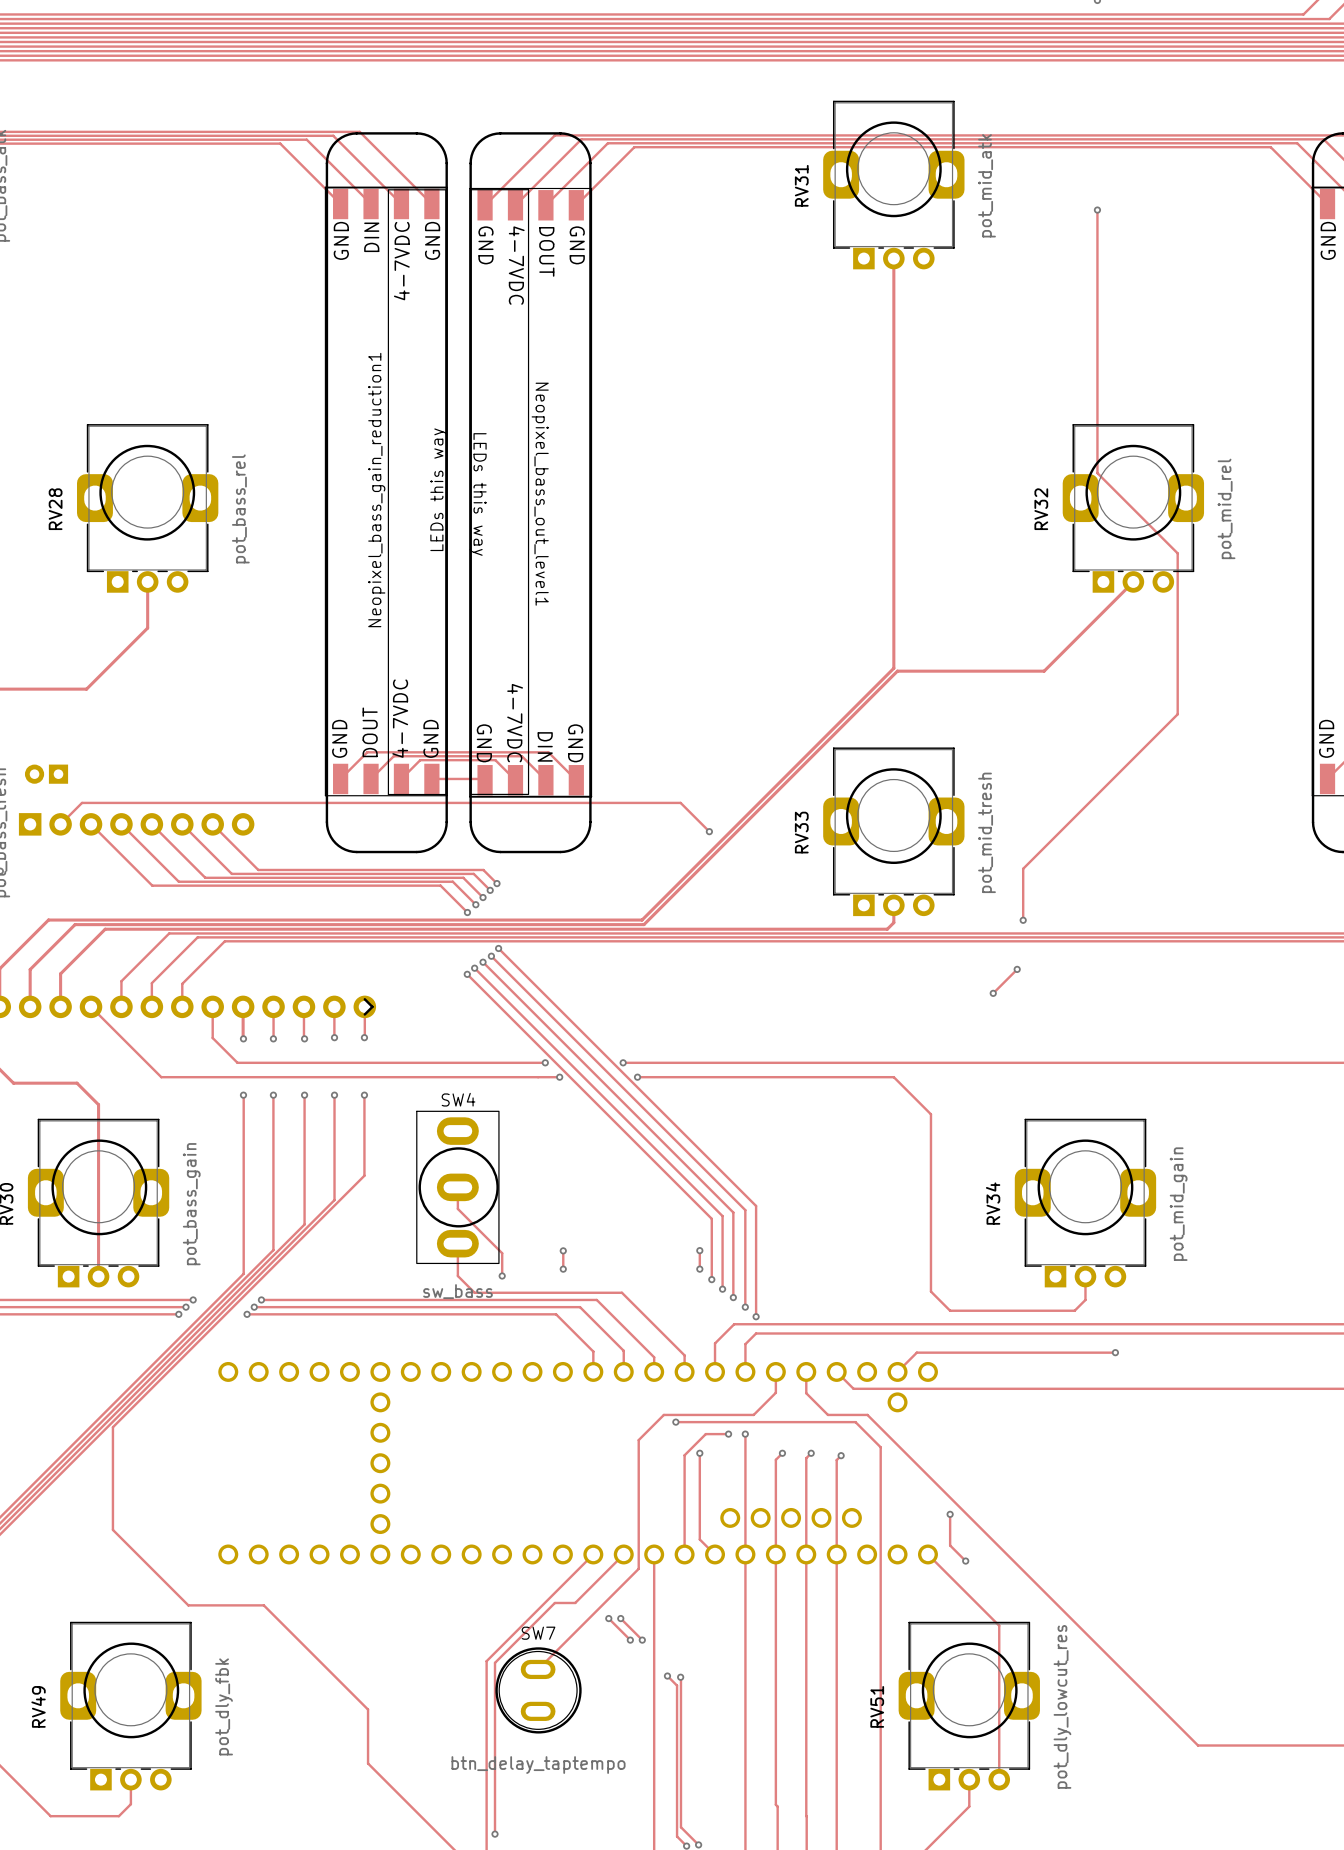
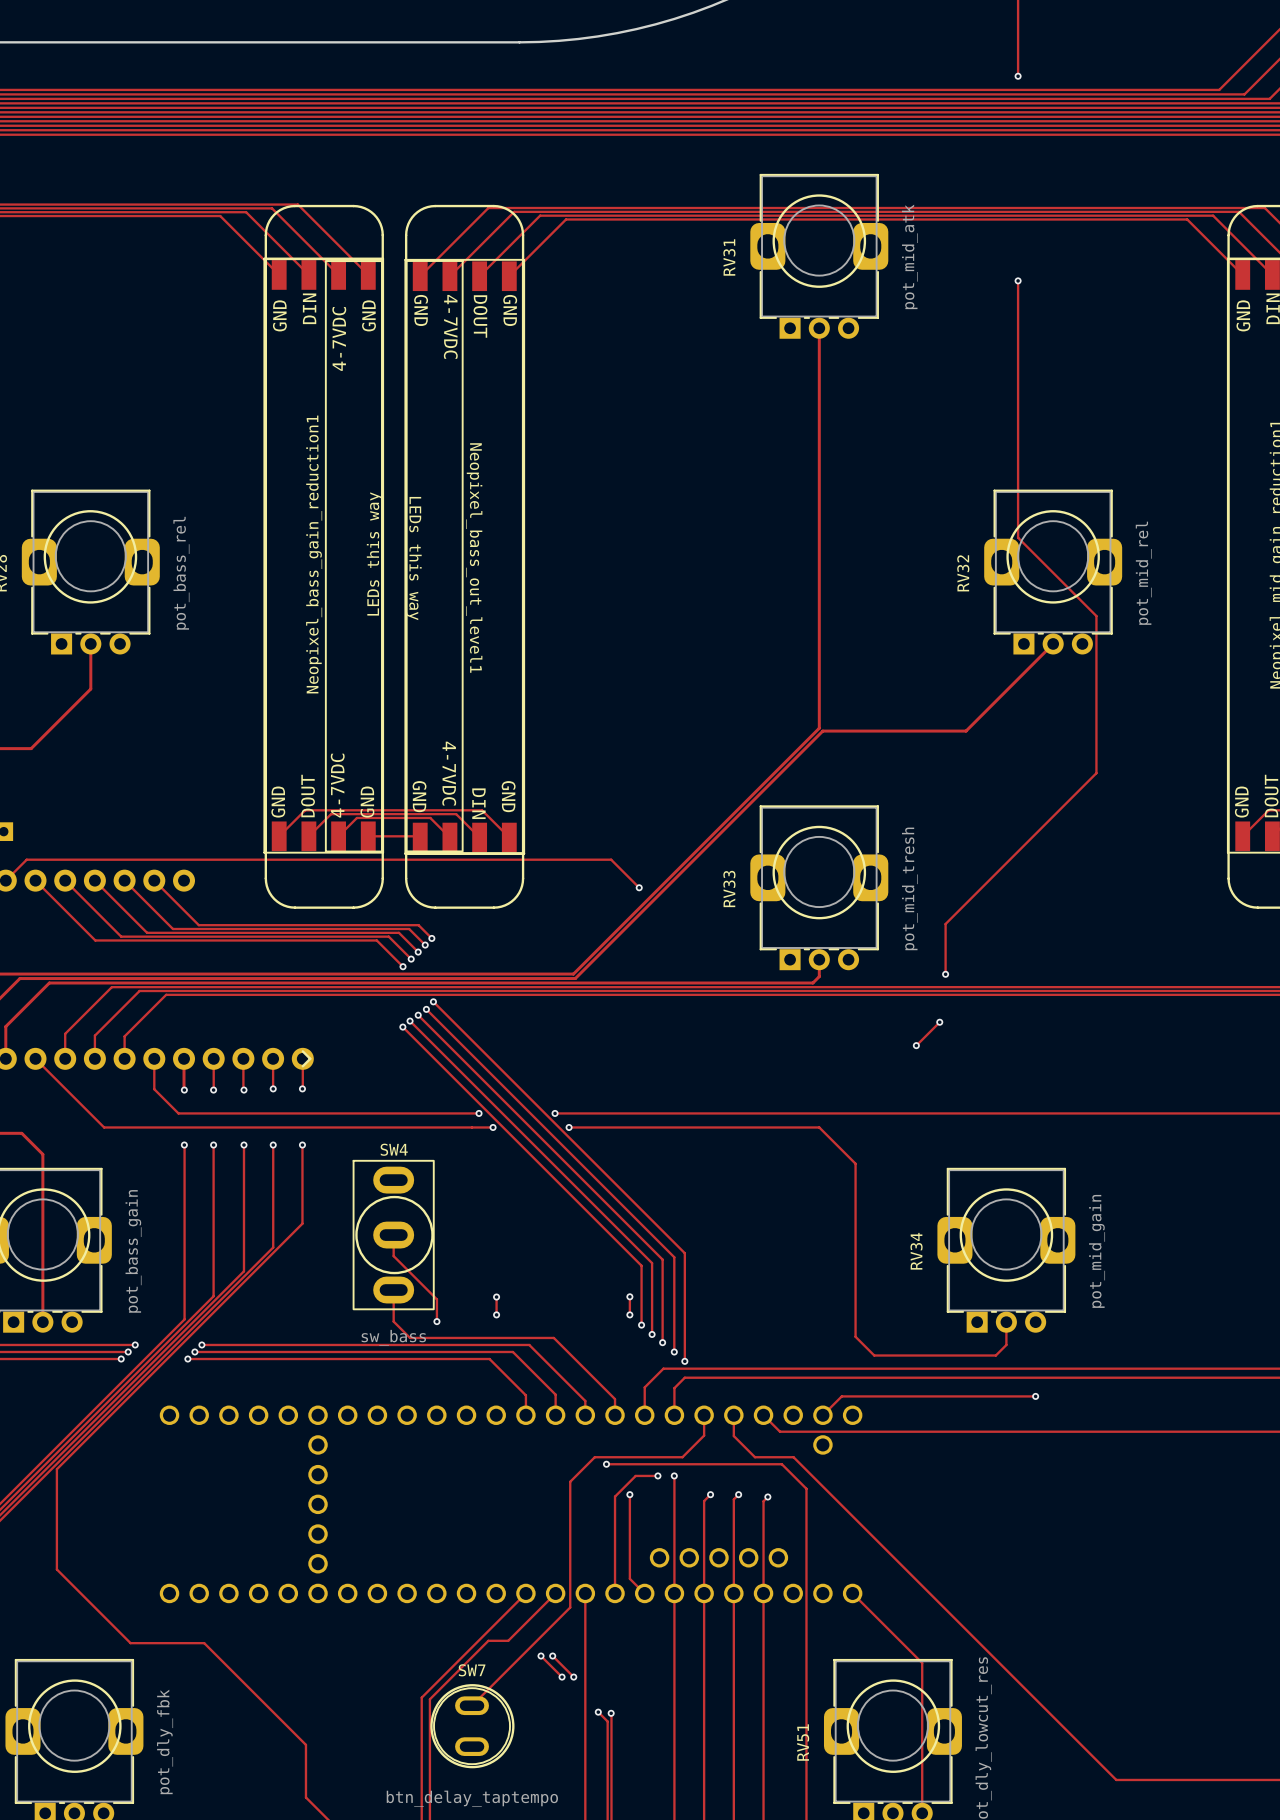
track: (950, 1514) (950, 1545) (965, 1561) -> none
via: (950, 1514) -> none
via: (965, 1561) -> none

